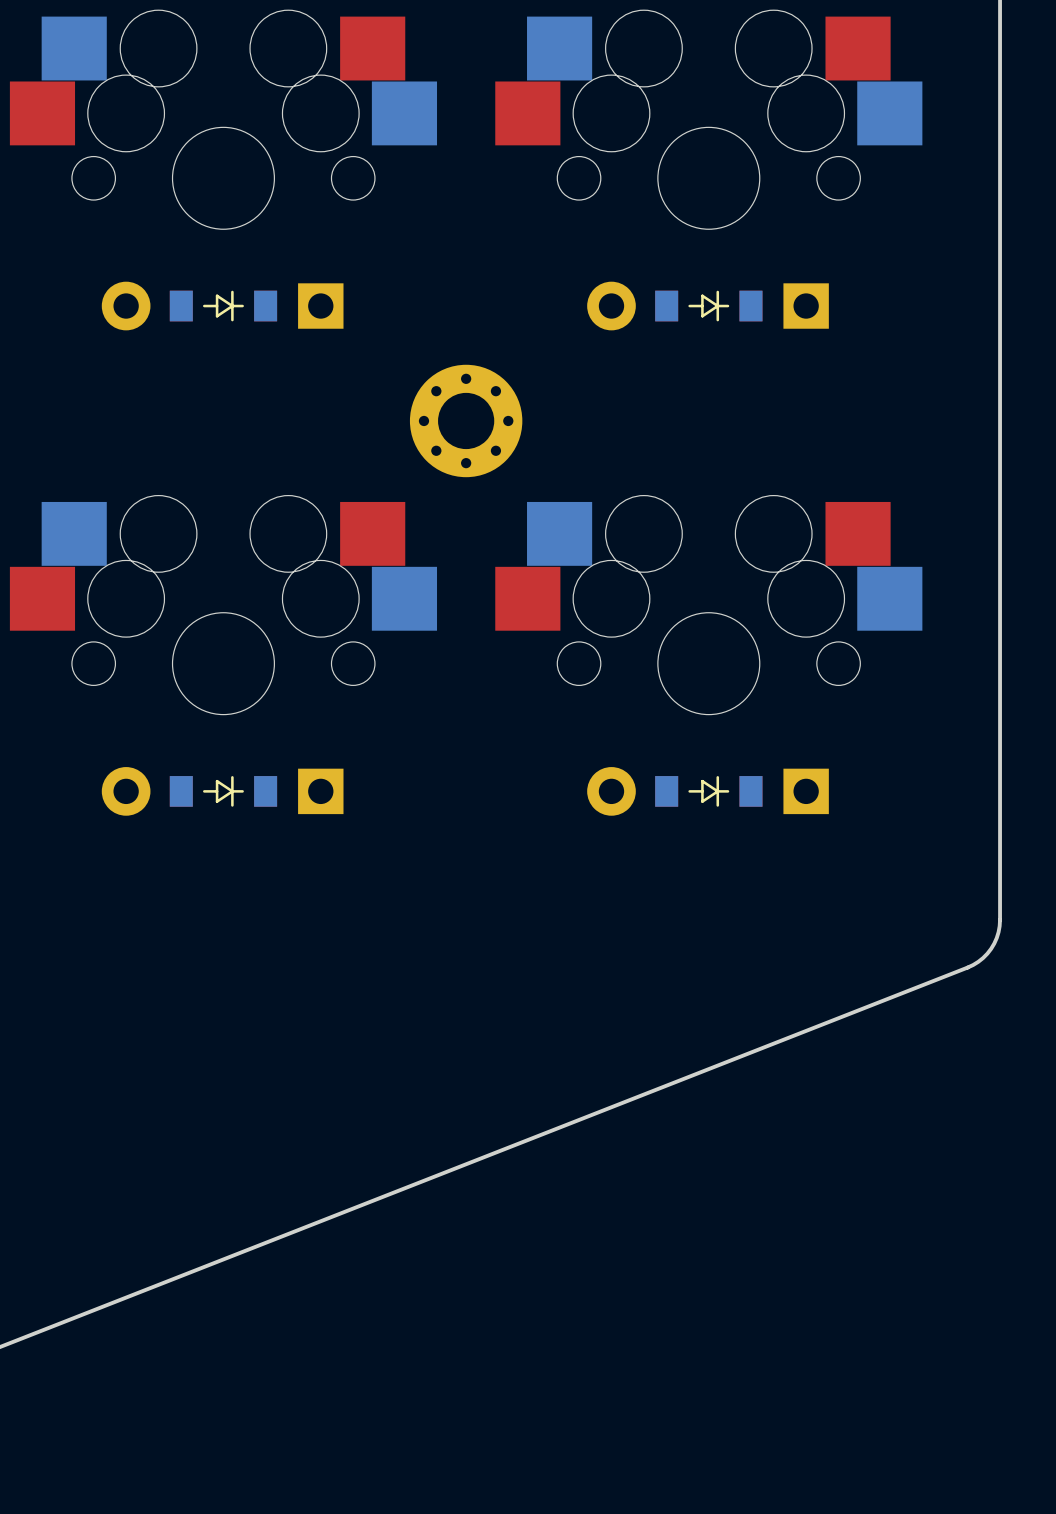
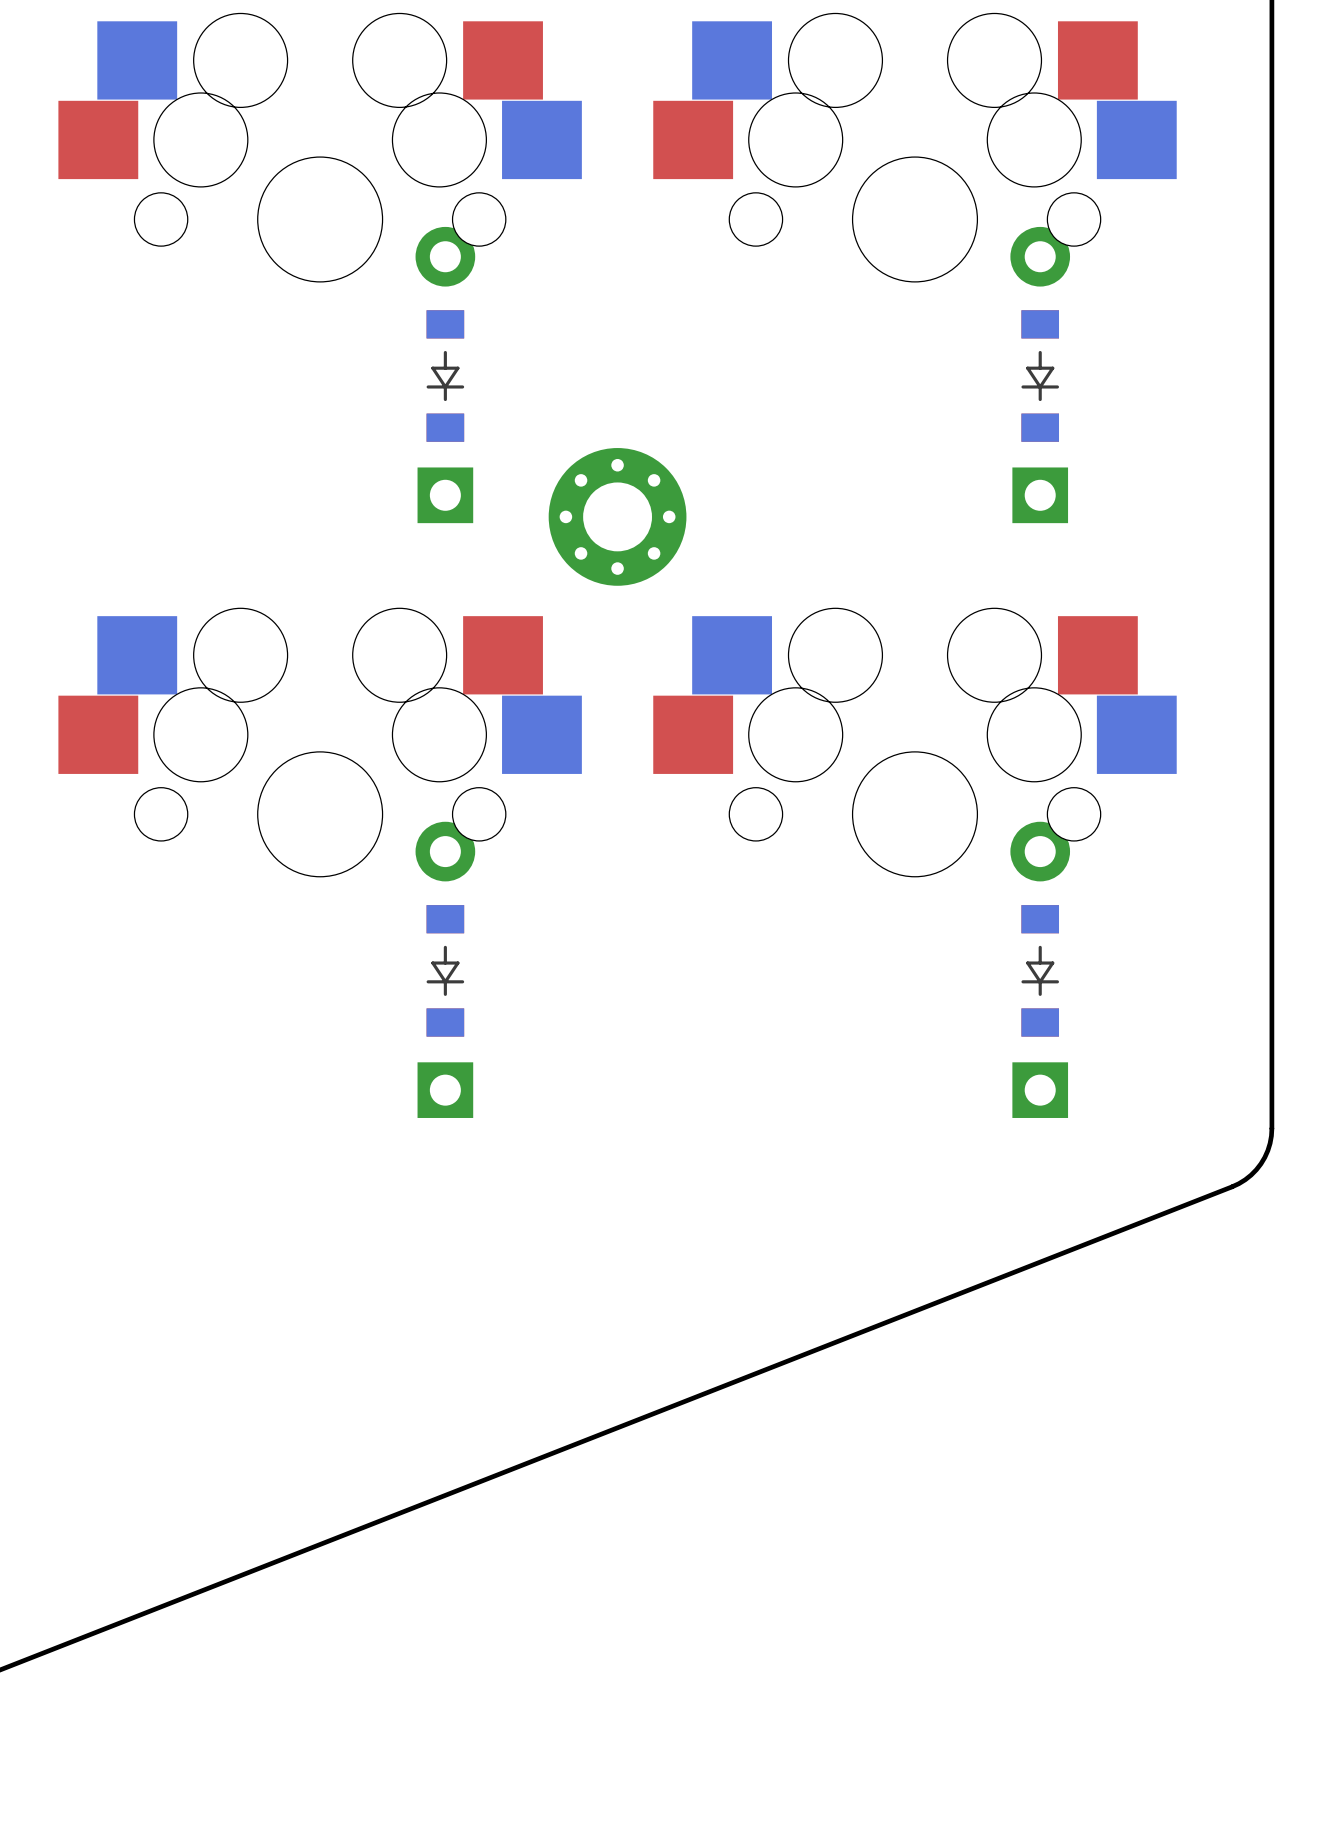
part rotation: 0° (222, 306) -> 90° clockwise (445, 375)
part rotation: 0° (708, 306) -> 90° clockwise (1040, 375)
part rotation: 0° (222, 791) -> 90° clockwise (445, 969)
part rotation: 0° (708, 791) -> 90° clockwise (1040, 969)

